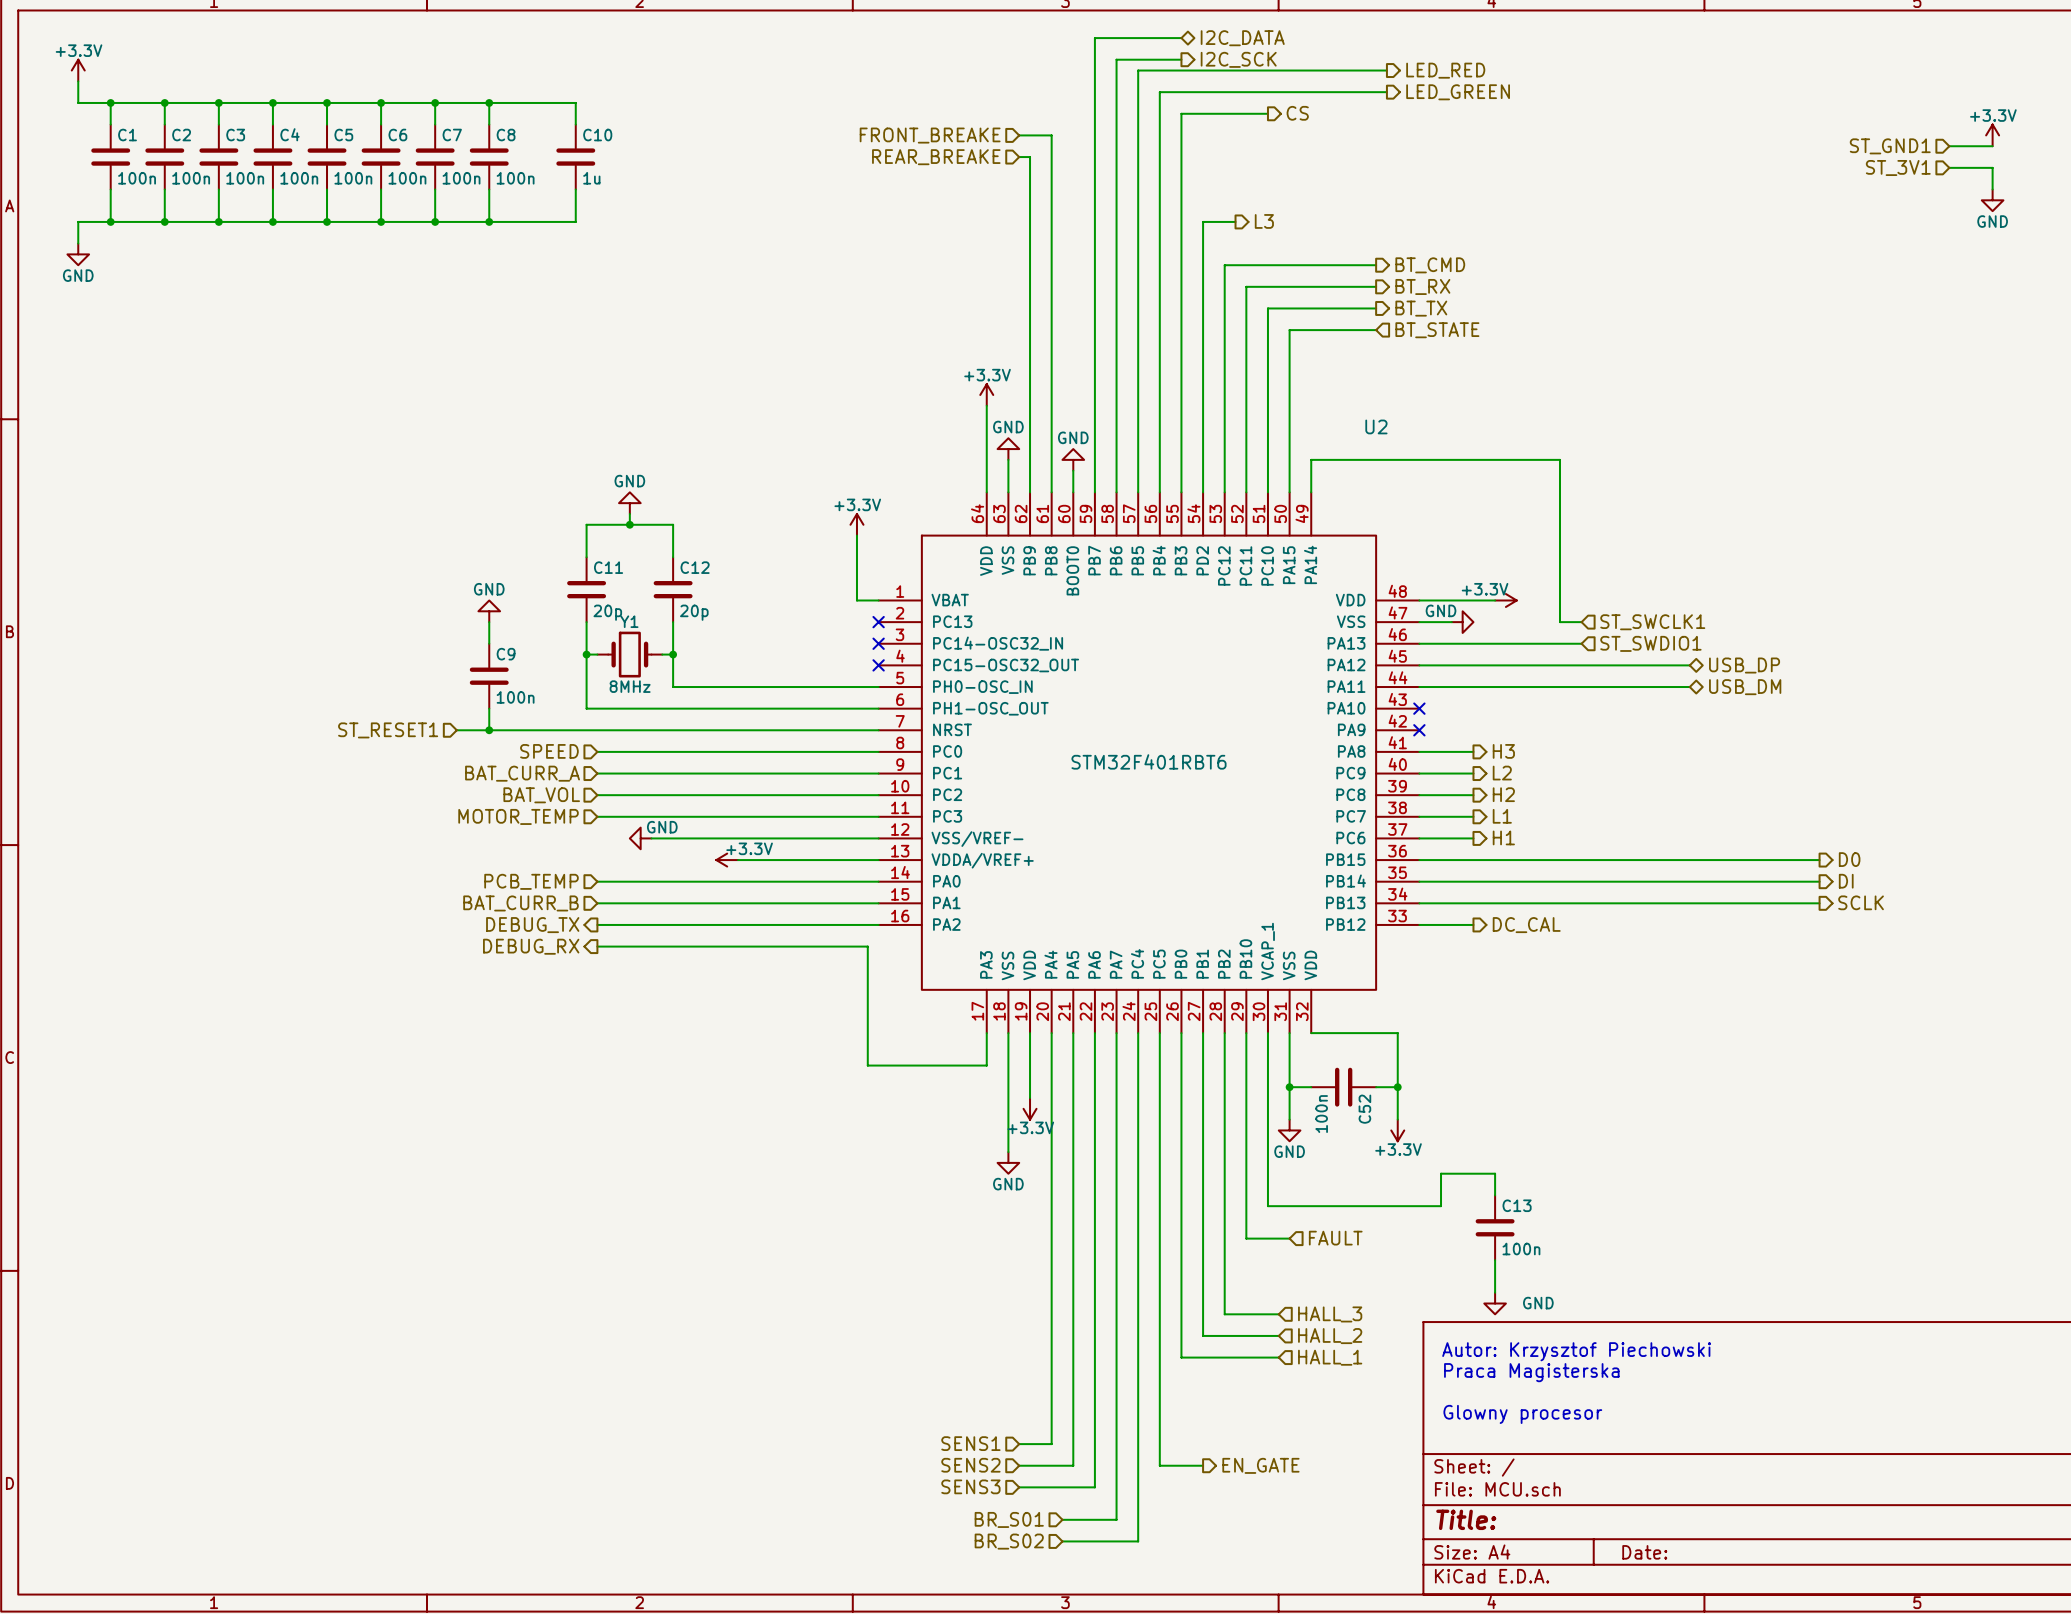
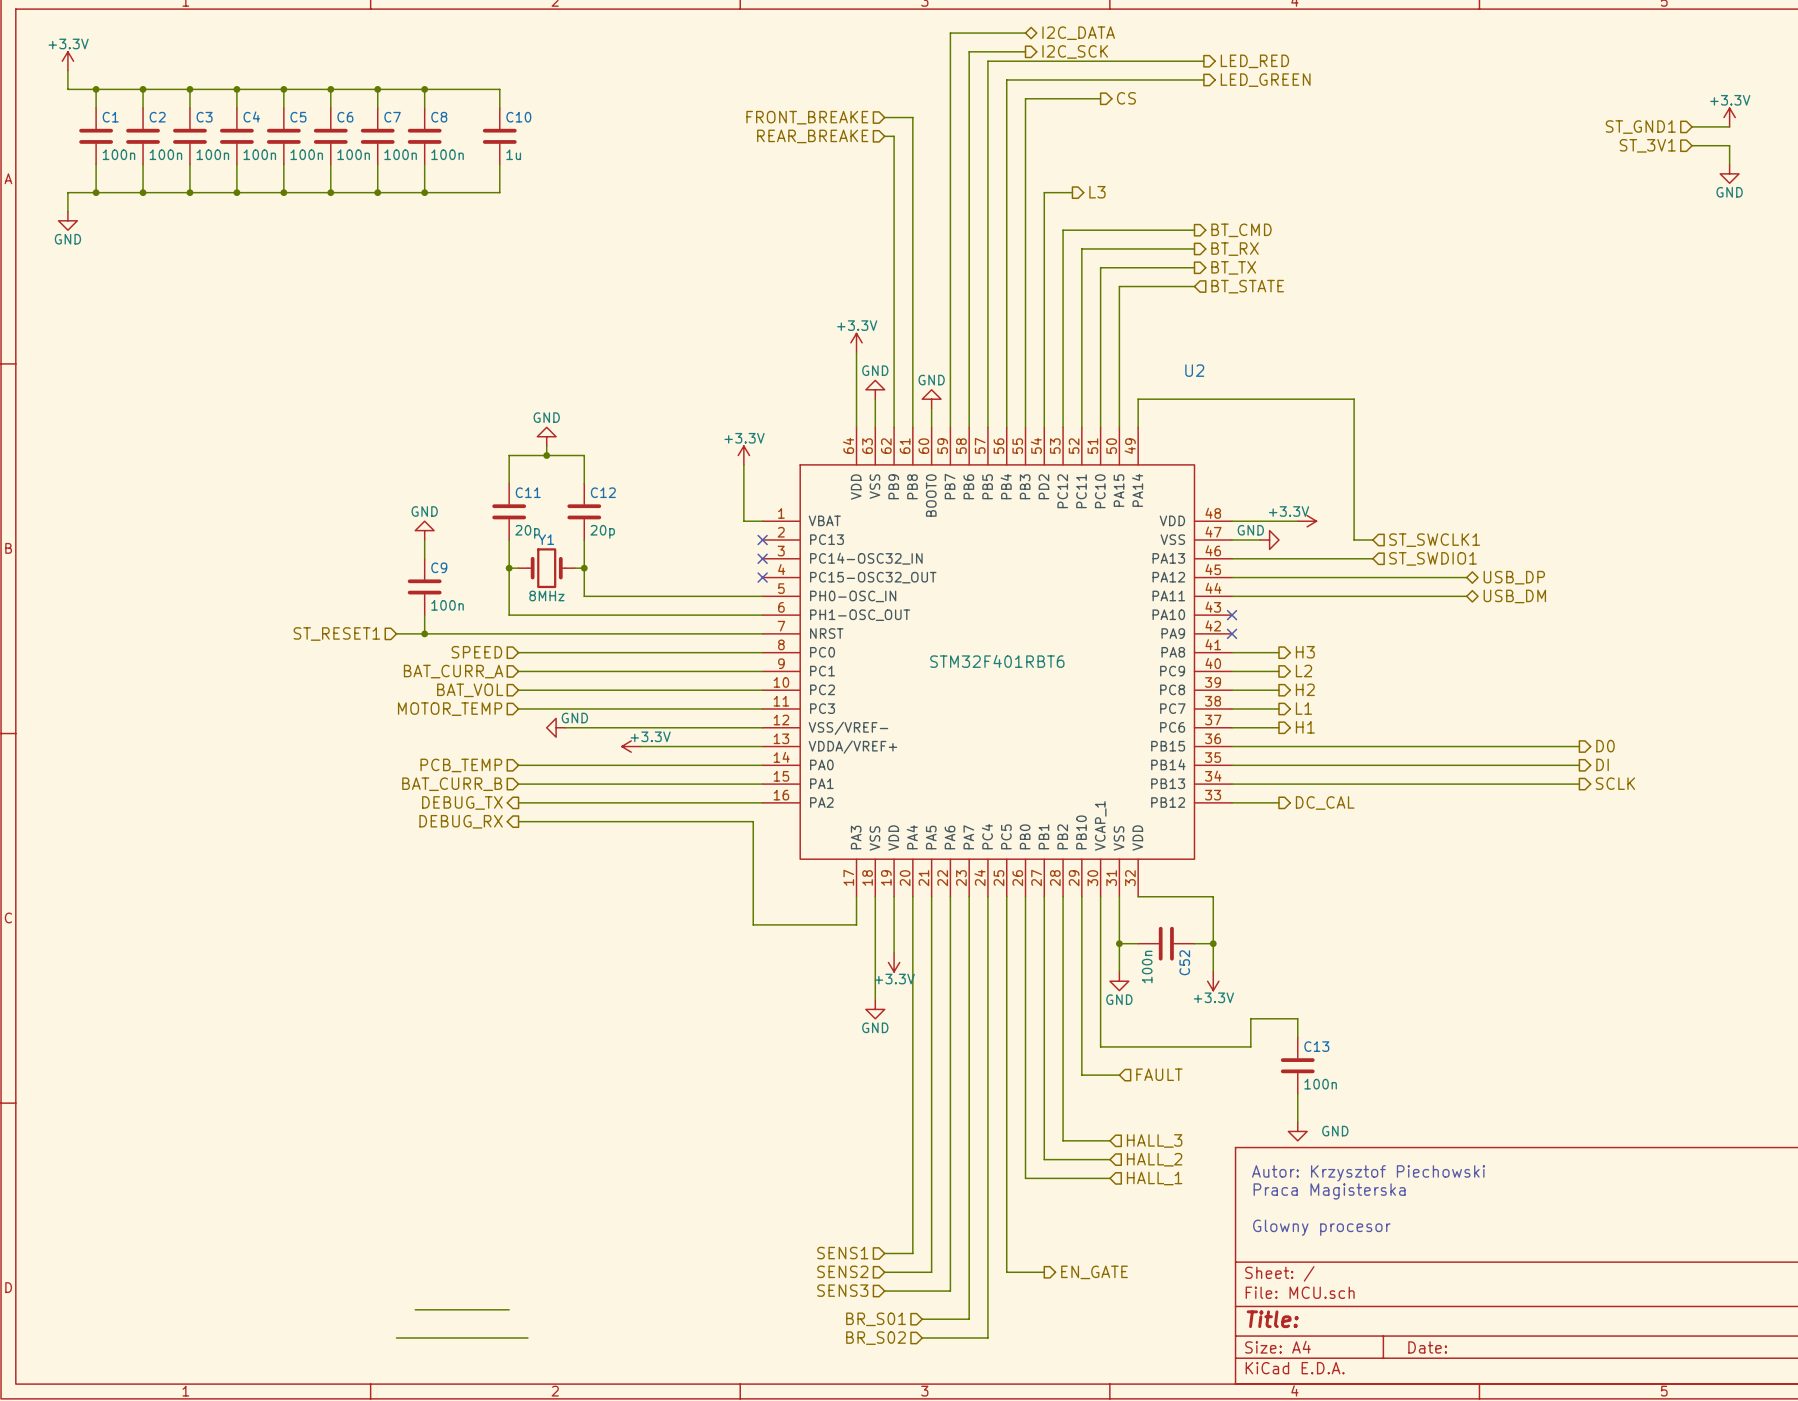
wire: none -> (415, 1309) (509, 1309)
wire: none -> (396, 1337) (527, 1337)

